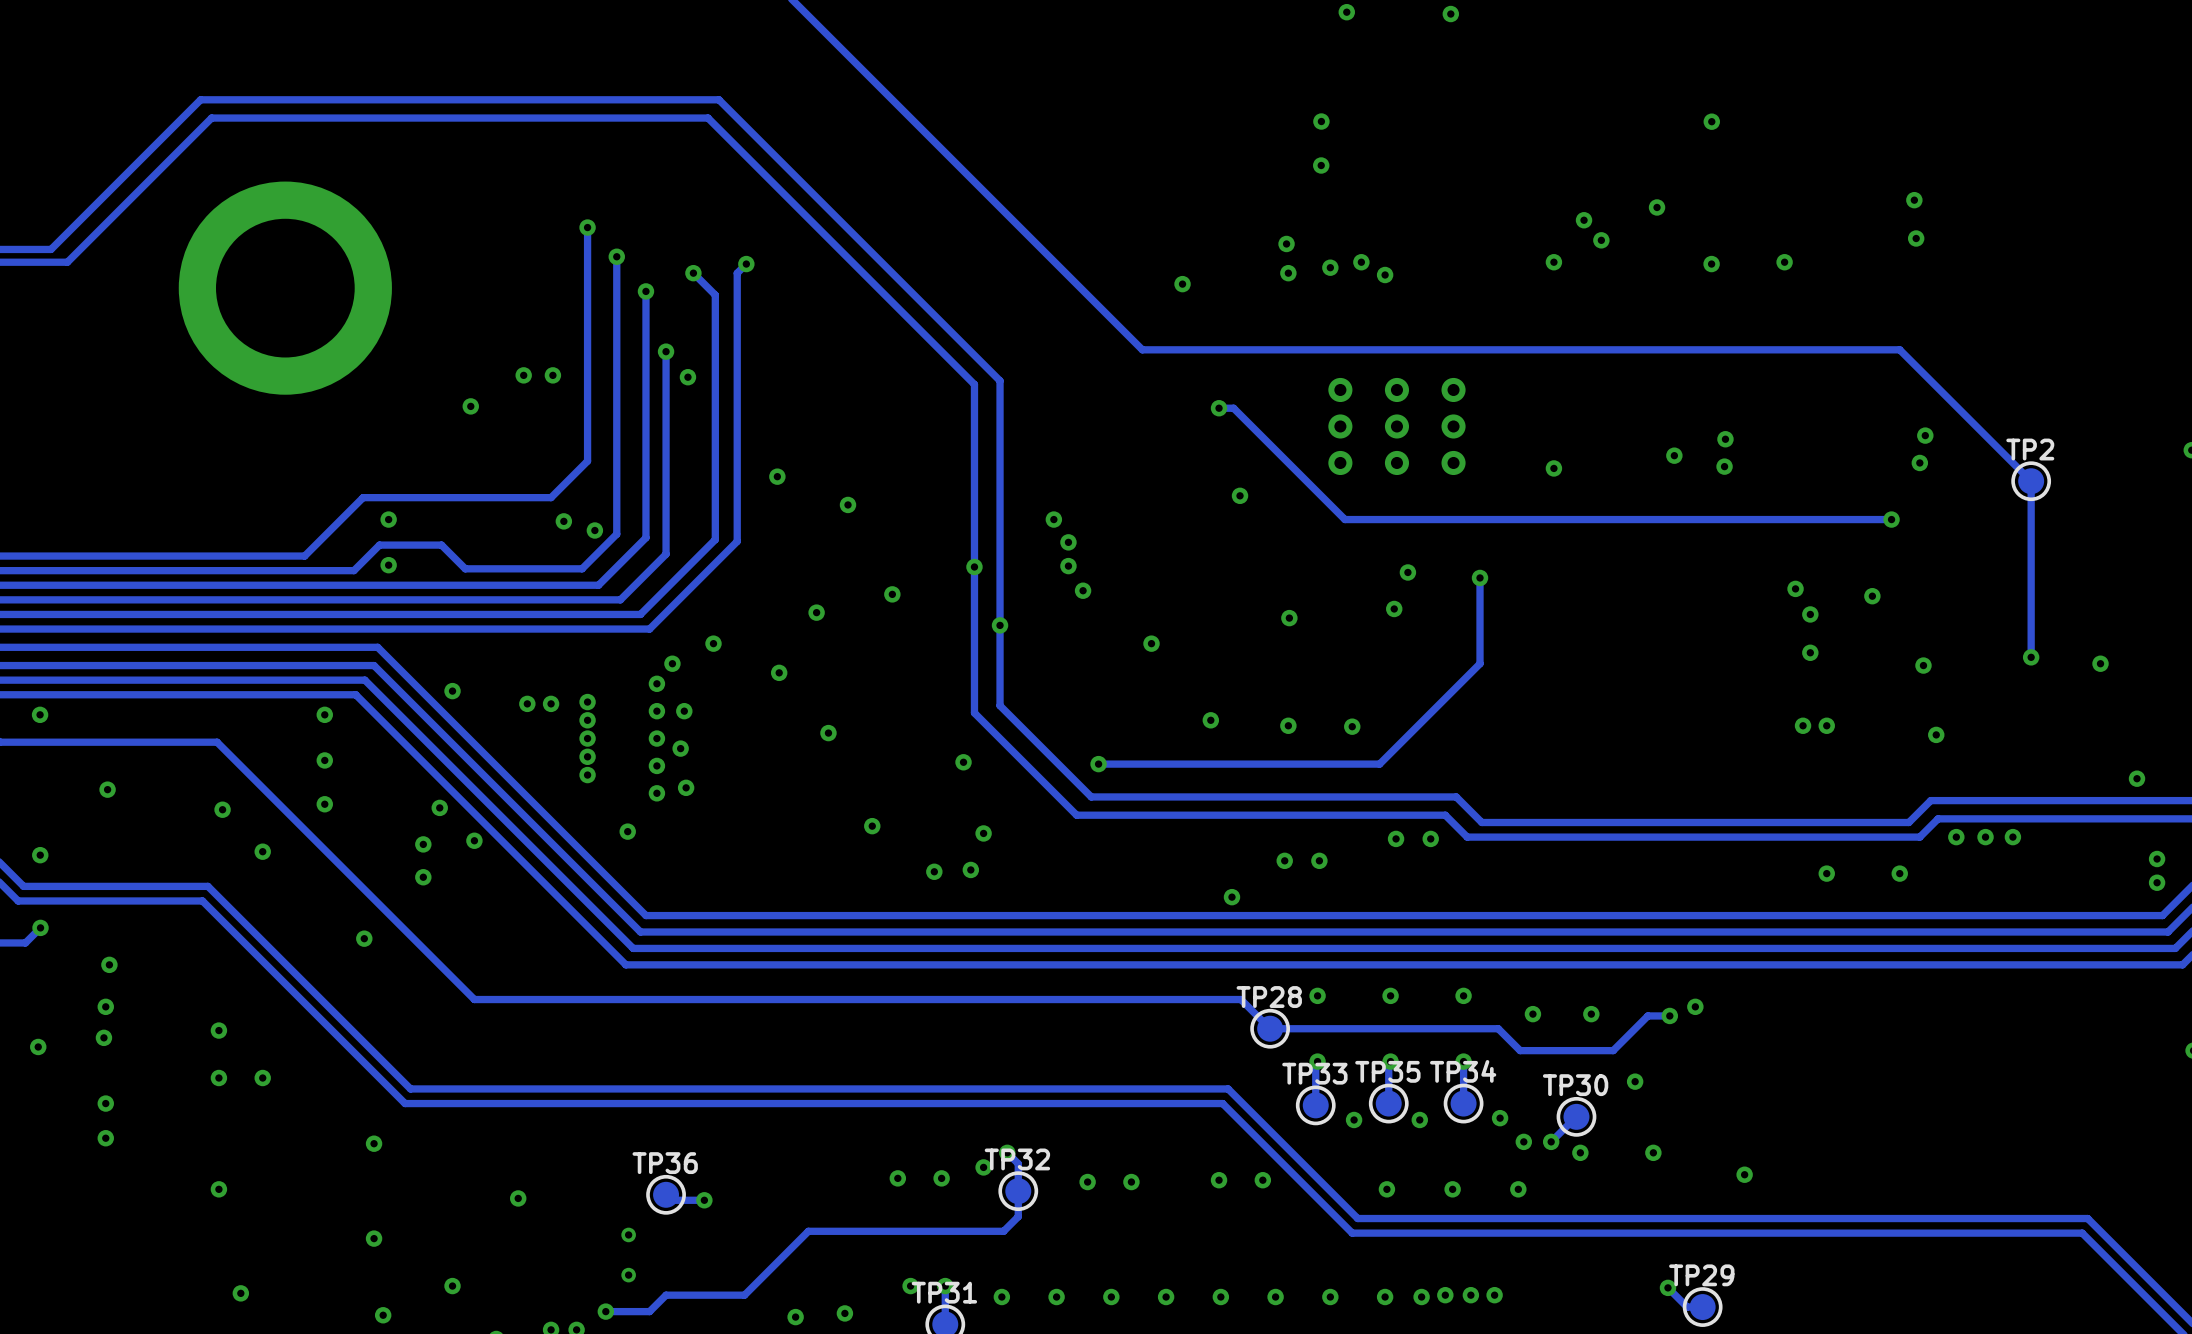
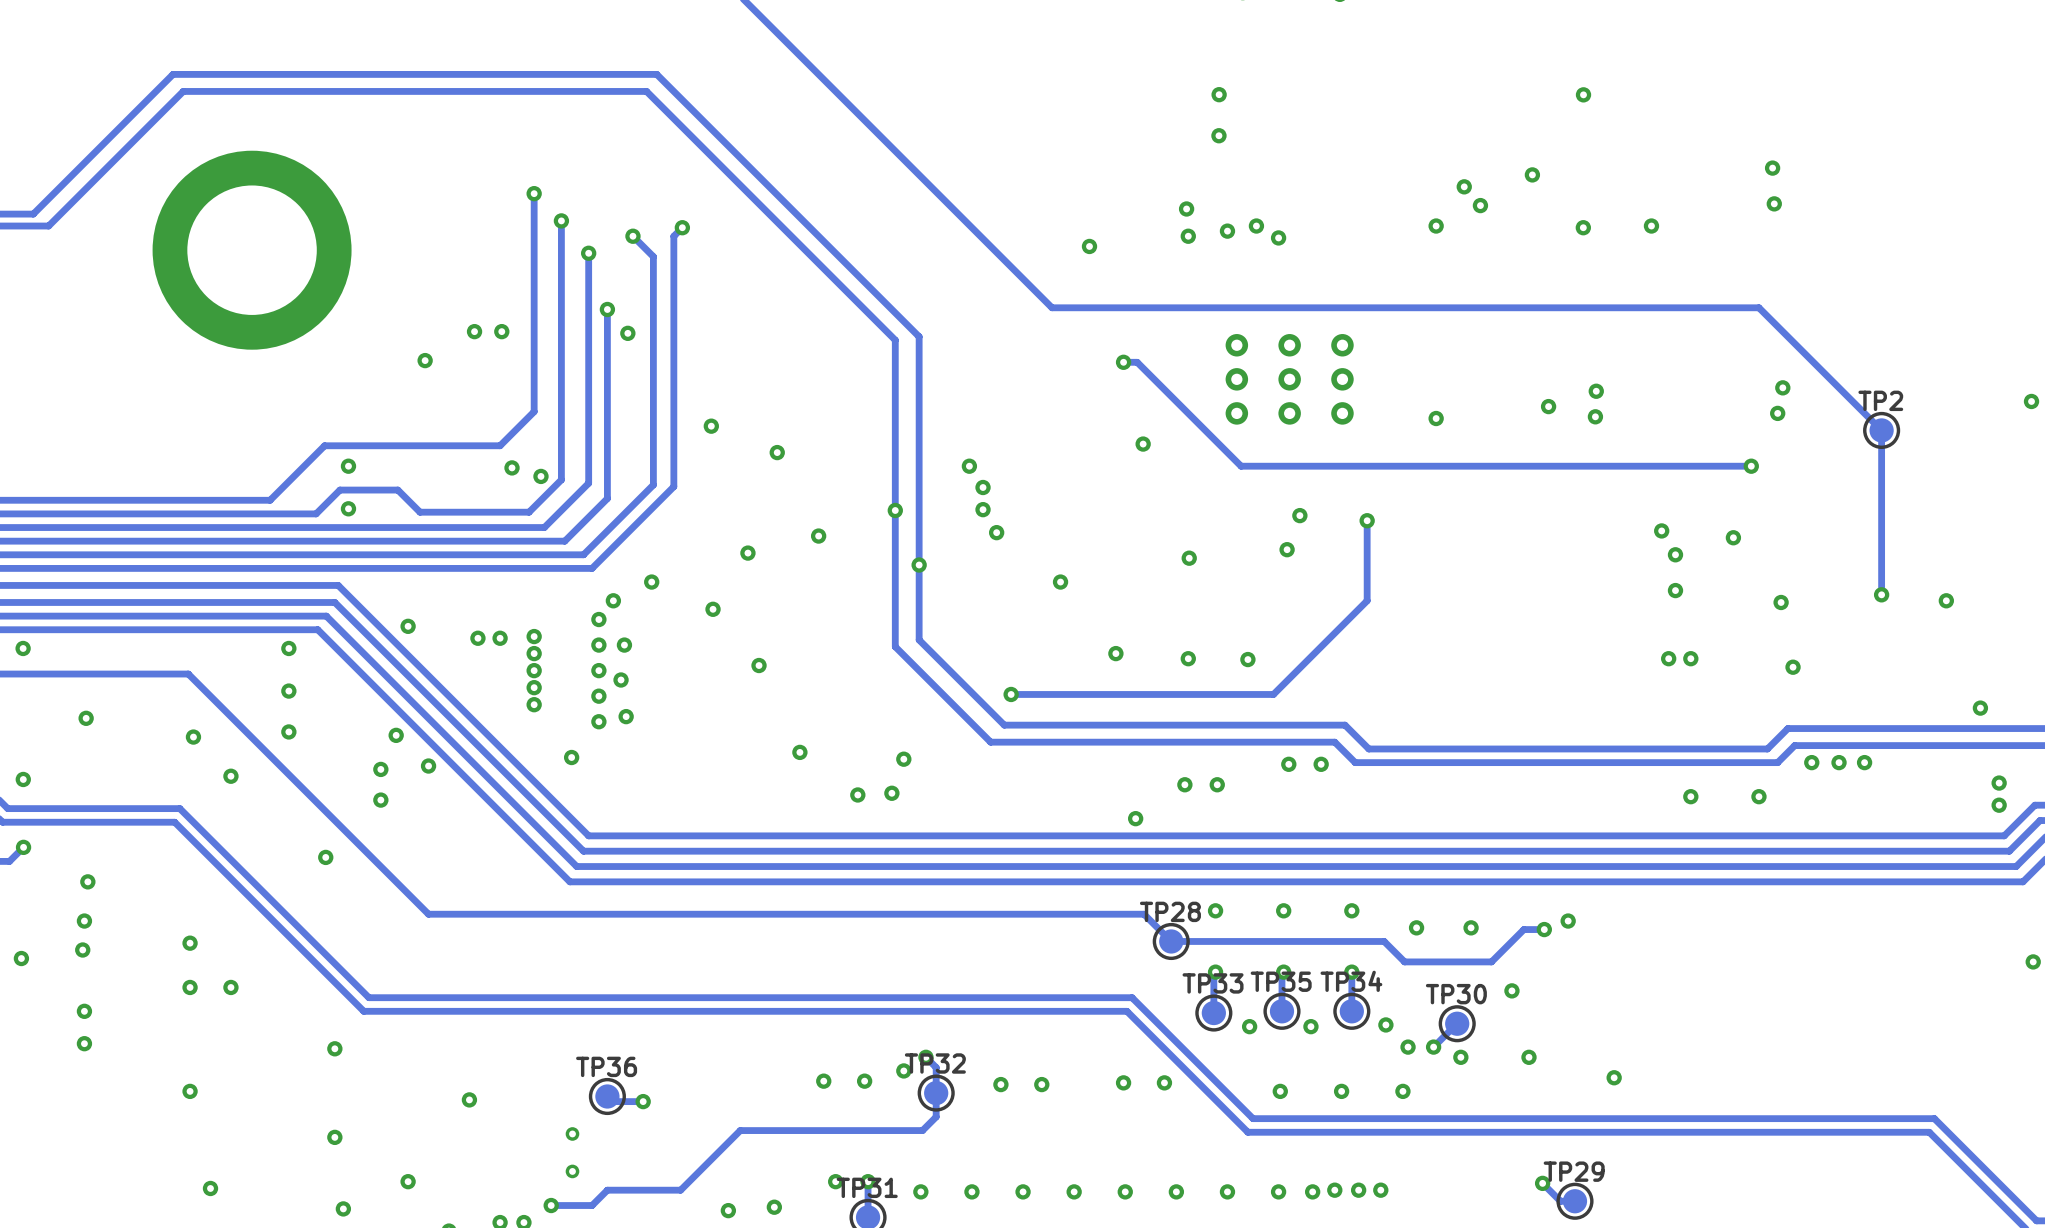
via: (963, 762) -> none

